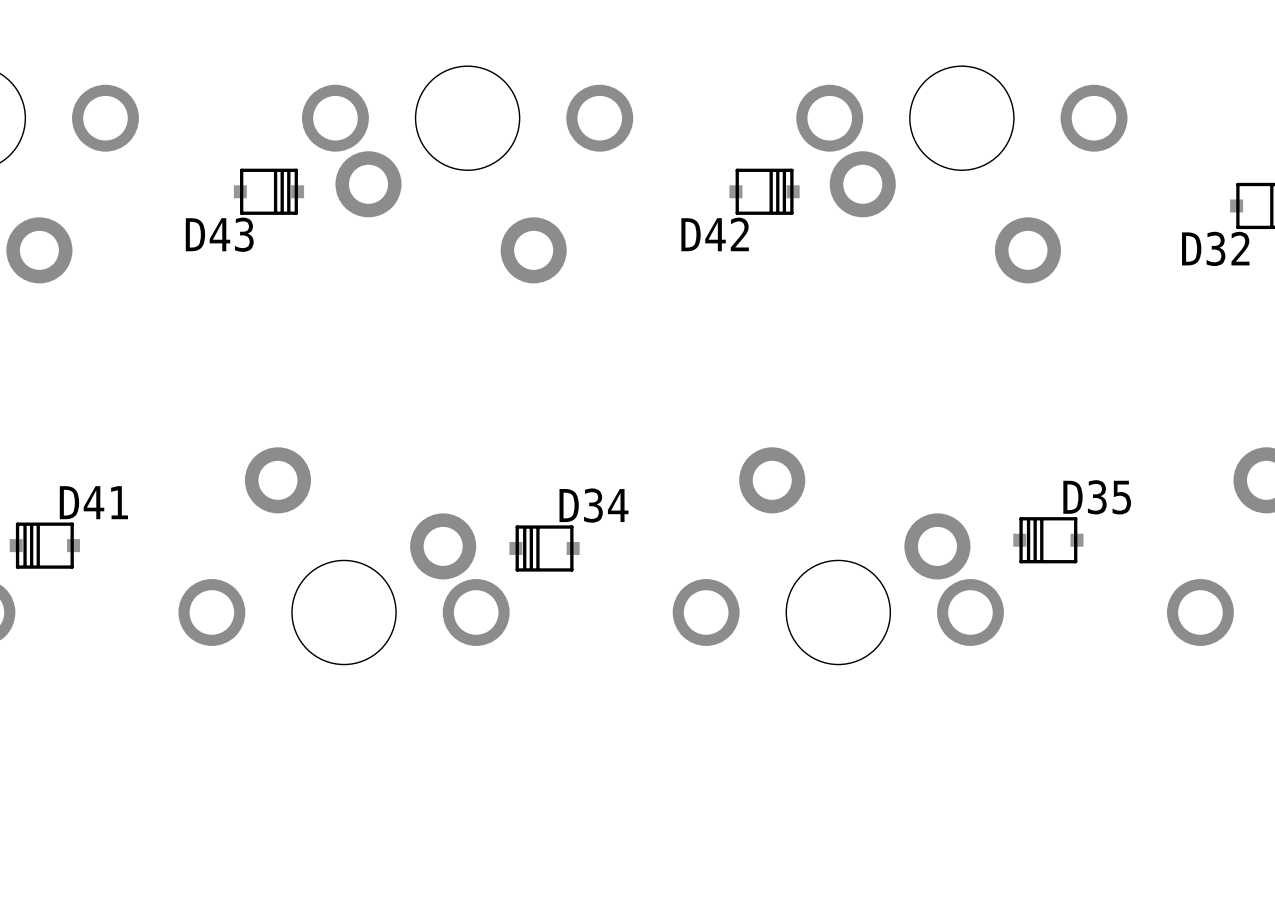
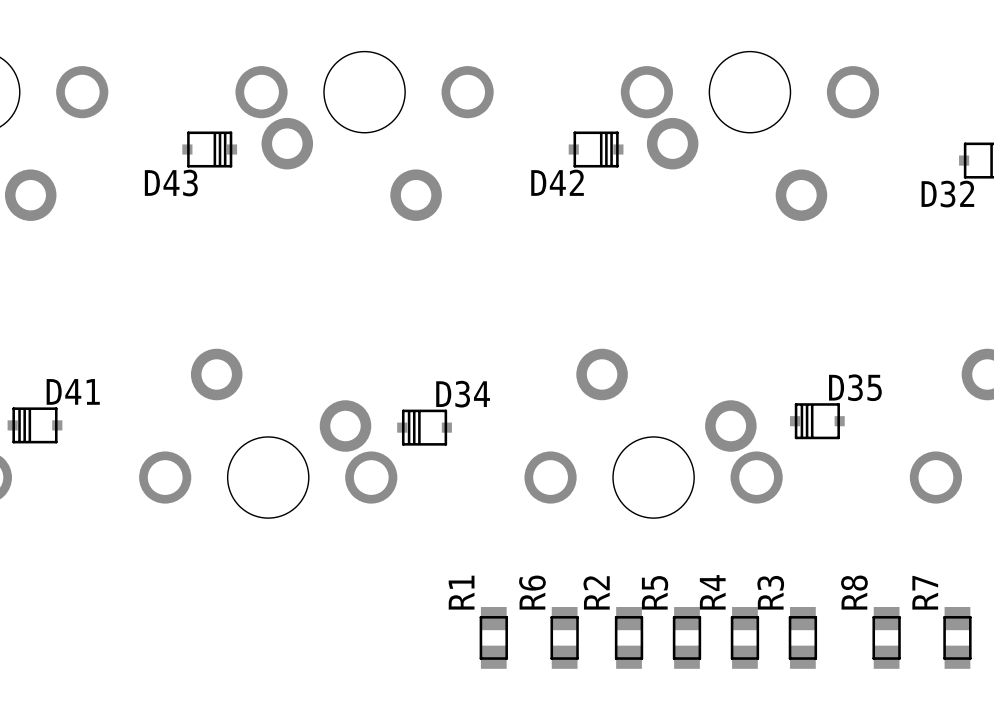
R1: none -> (493, 637)
R6: none -> (564, 637)
R2: none -> (629, 637)
R5: none -> (686, 637)
R4: none -> (744, 637)
R3: none -> (802, 637)
R8: none -> (886, 637)
R7: none -> (957, 637)

